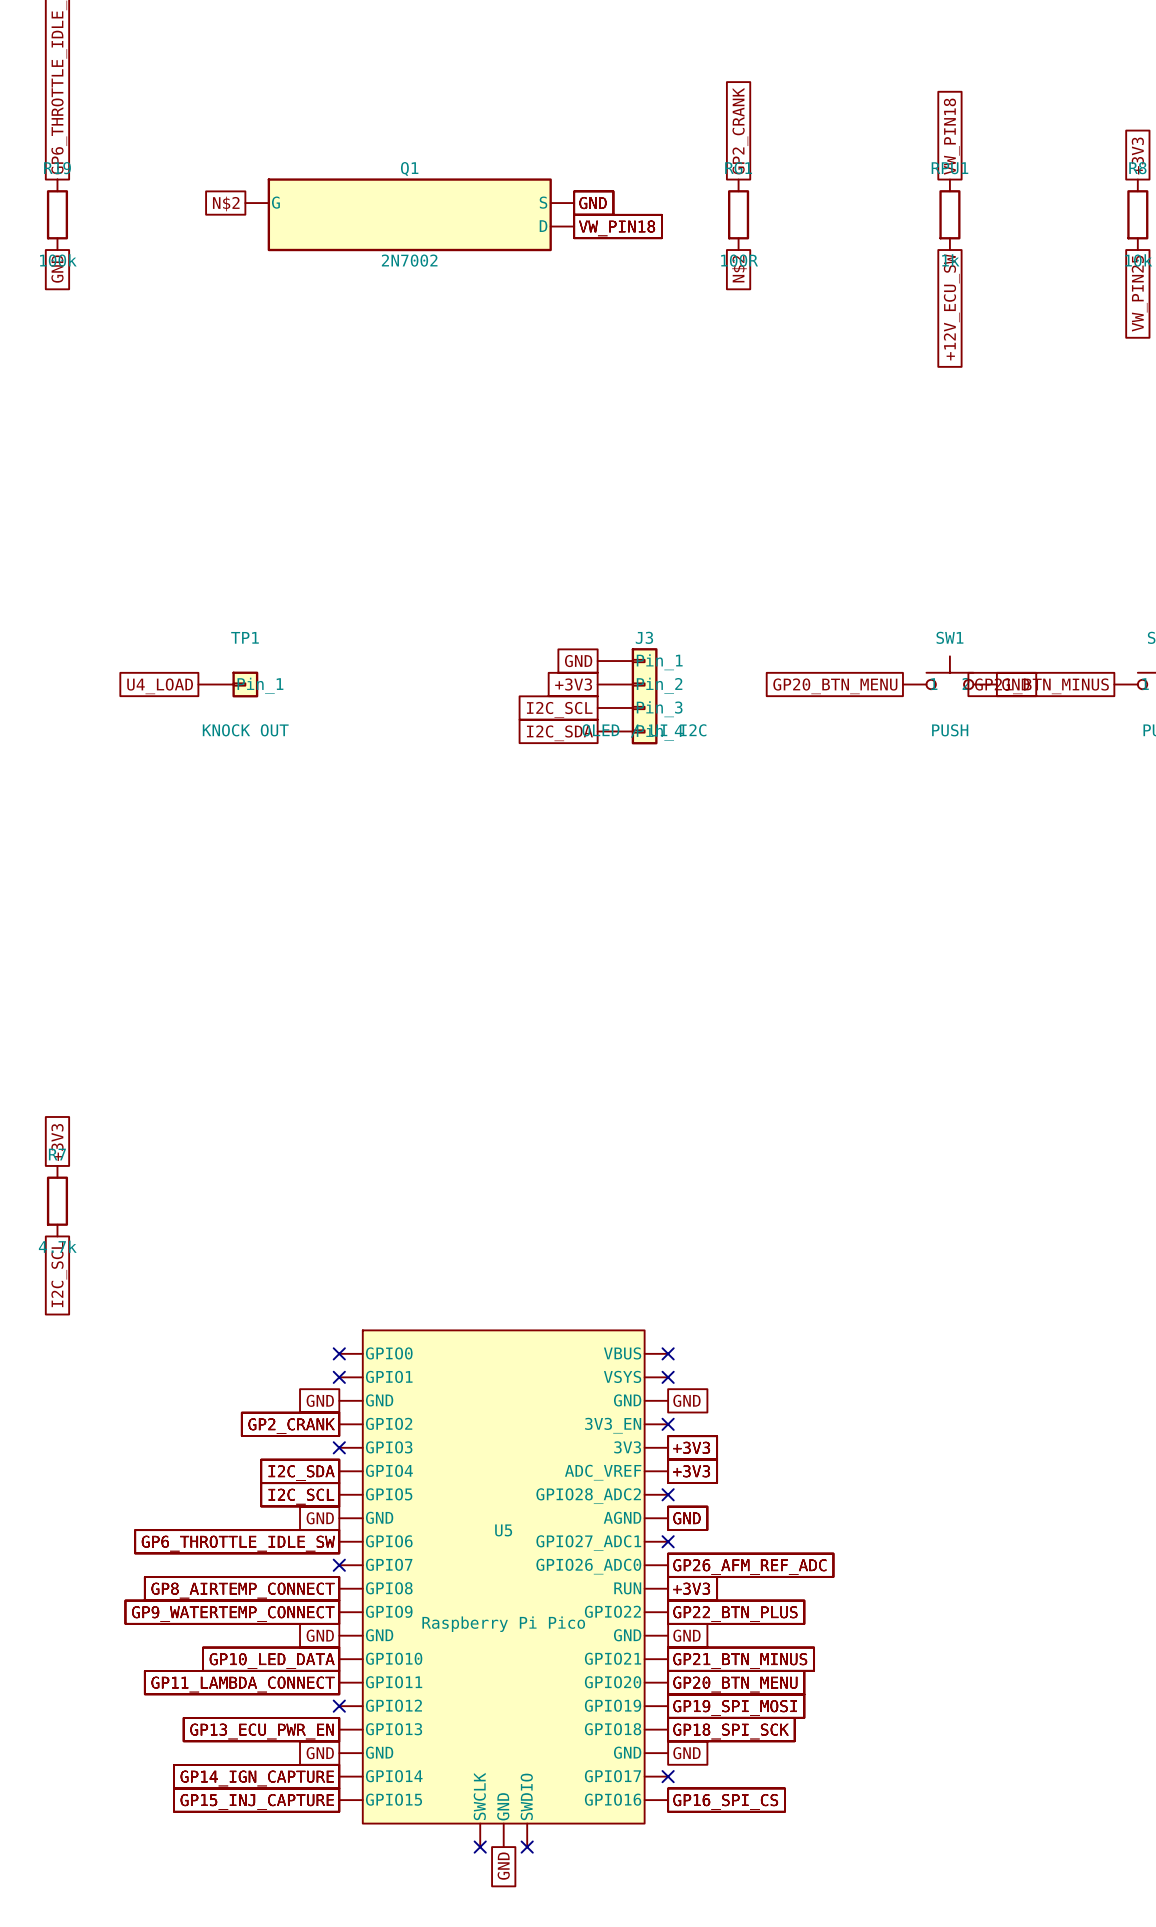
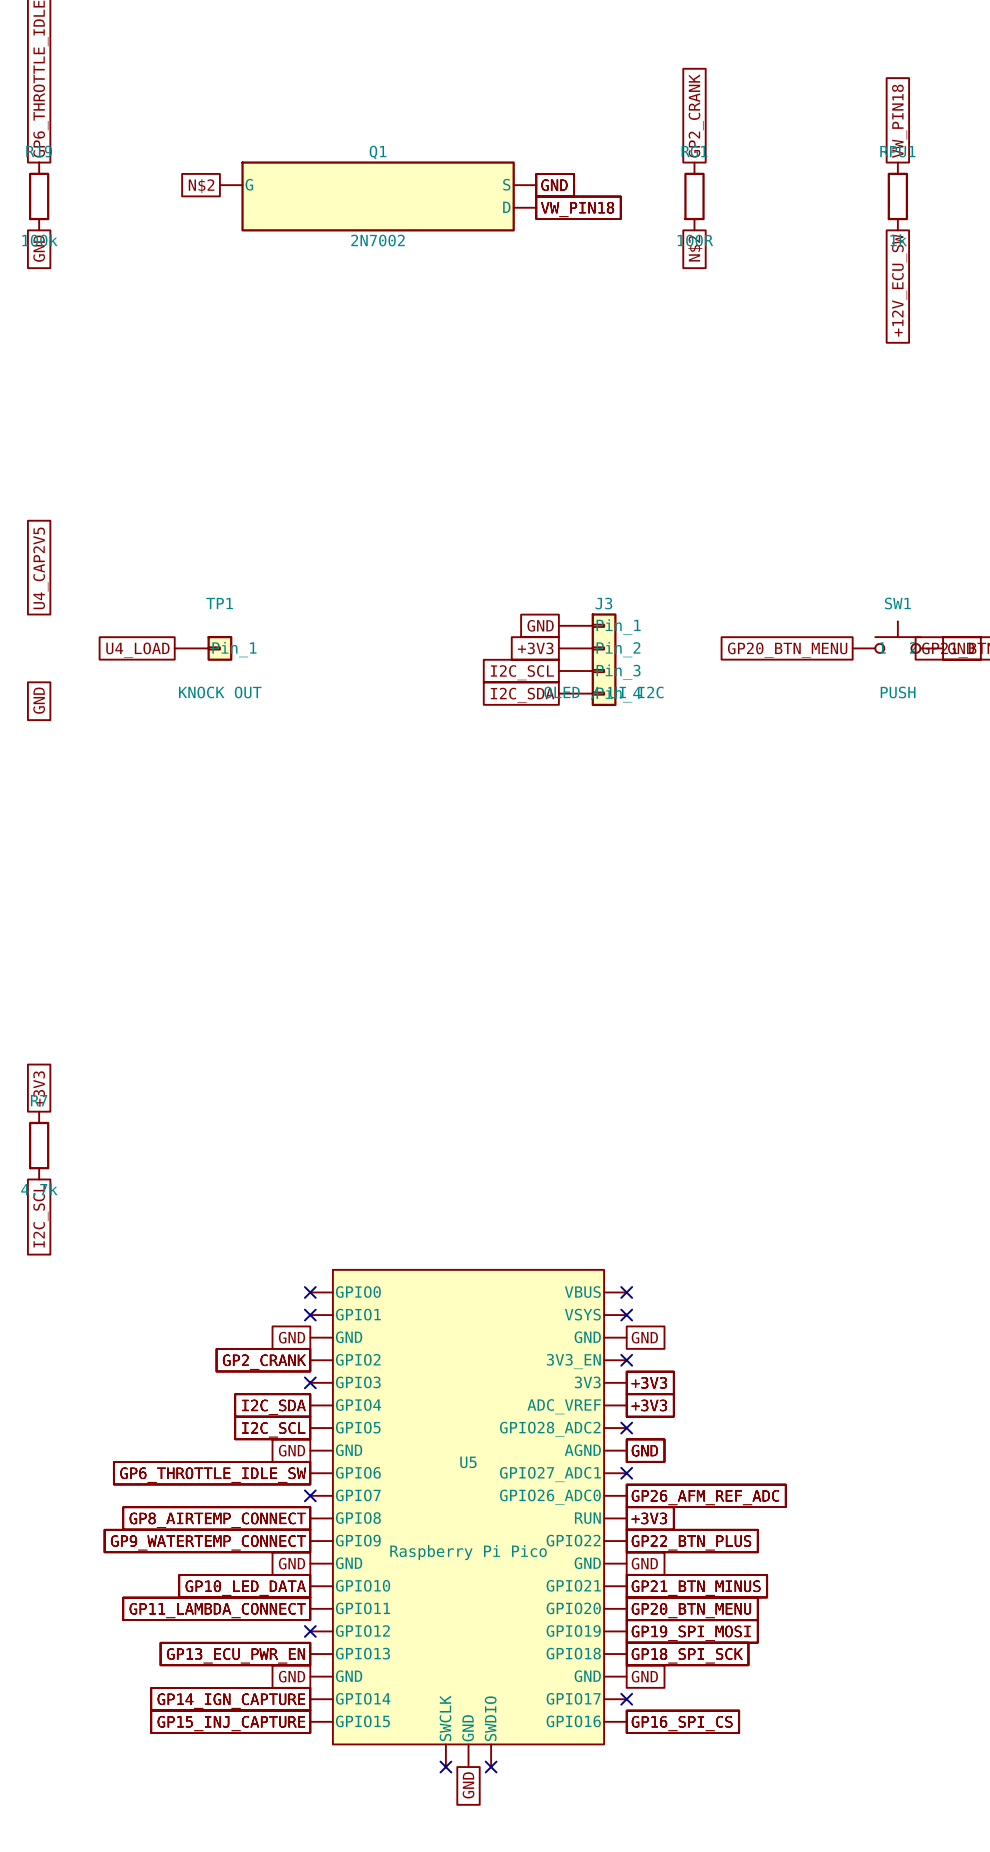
global label: none -> U4_CAP2V5 (40, 568)
global label: none -> GND (39, 700)

